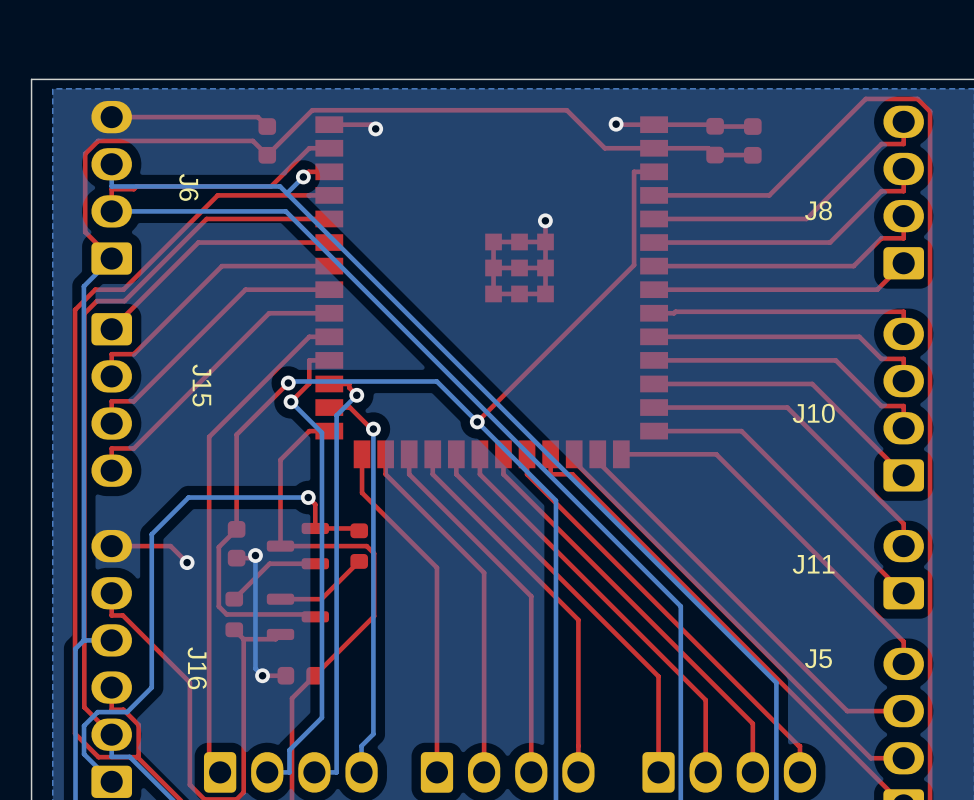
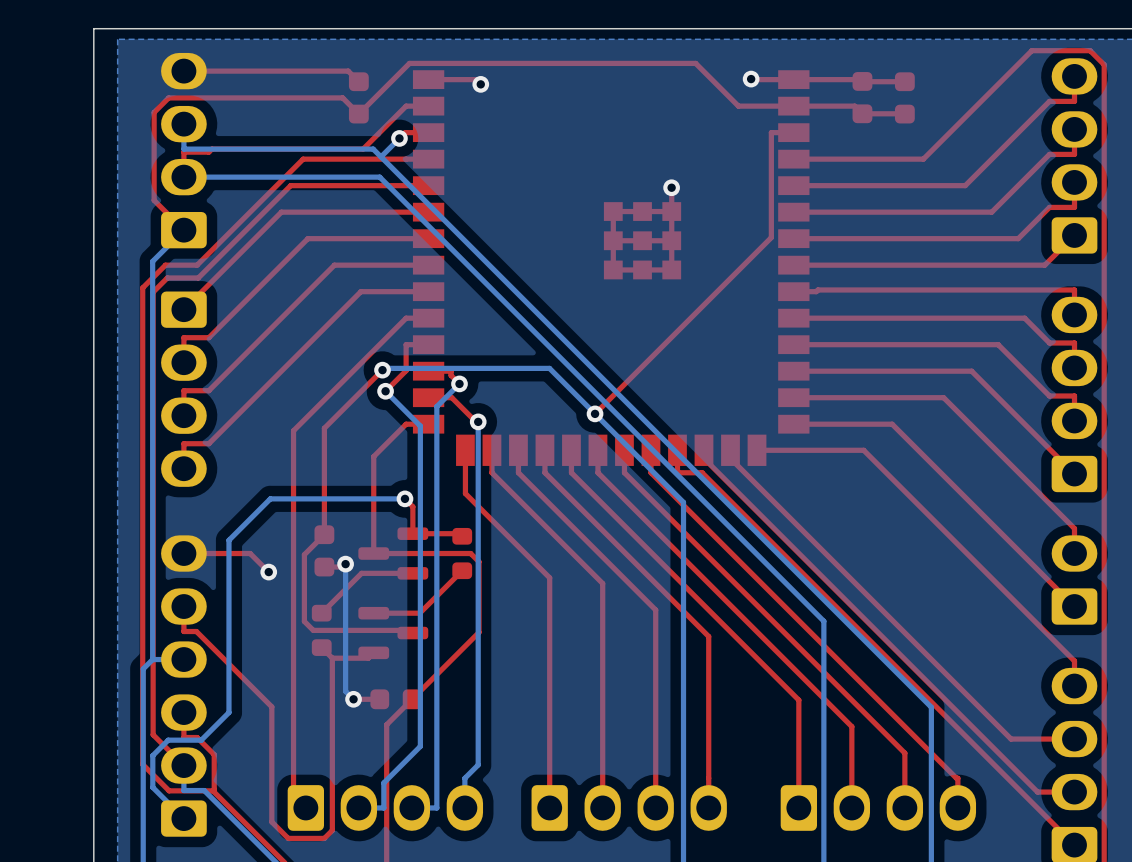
J6 name: J6 (188, 187) -> none
J8 name: J8 (818, 210) -> none
J15 name: J15 (201, 385) -> none
J10 name: J10 (813, 413) -> none
J11 name: J11 (813, 564) -> none
J5 name: J5 (818, 658) -> none
J16 name: J16 (197, 668) -> none

